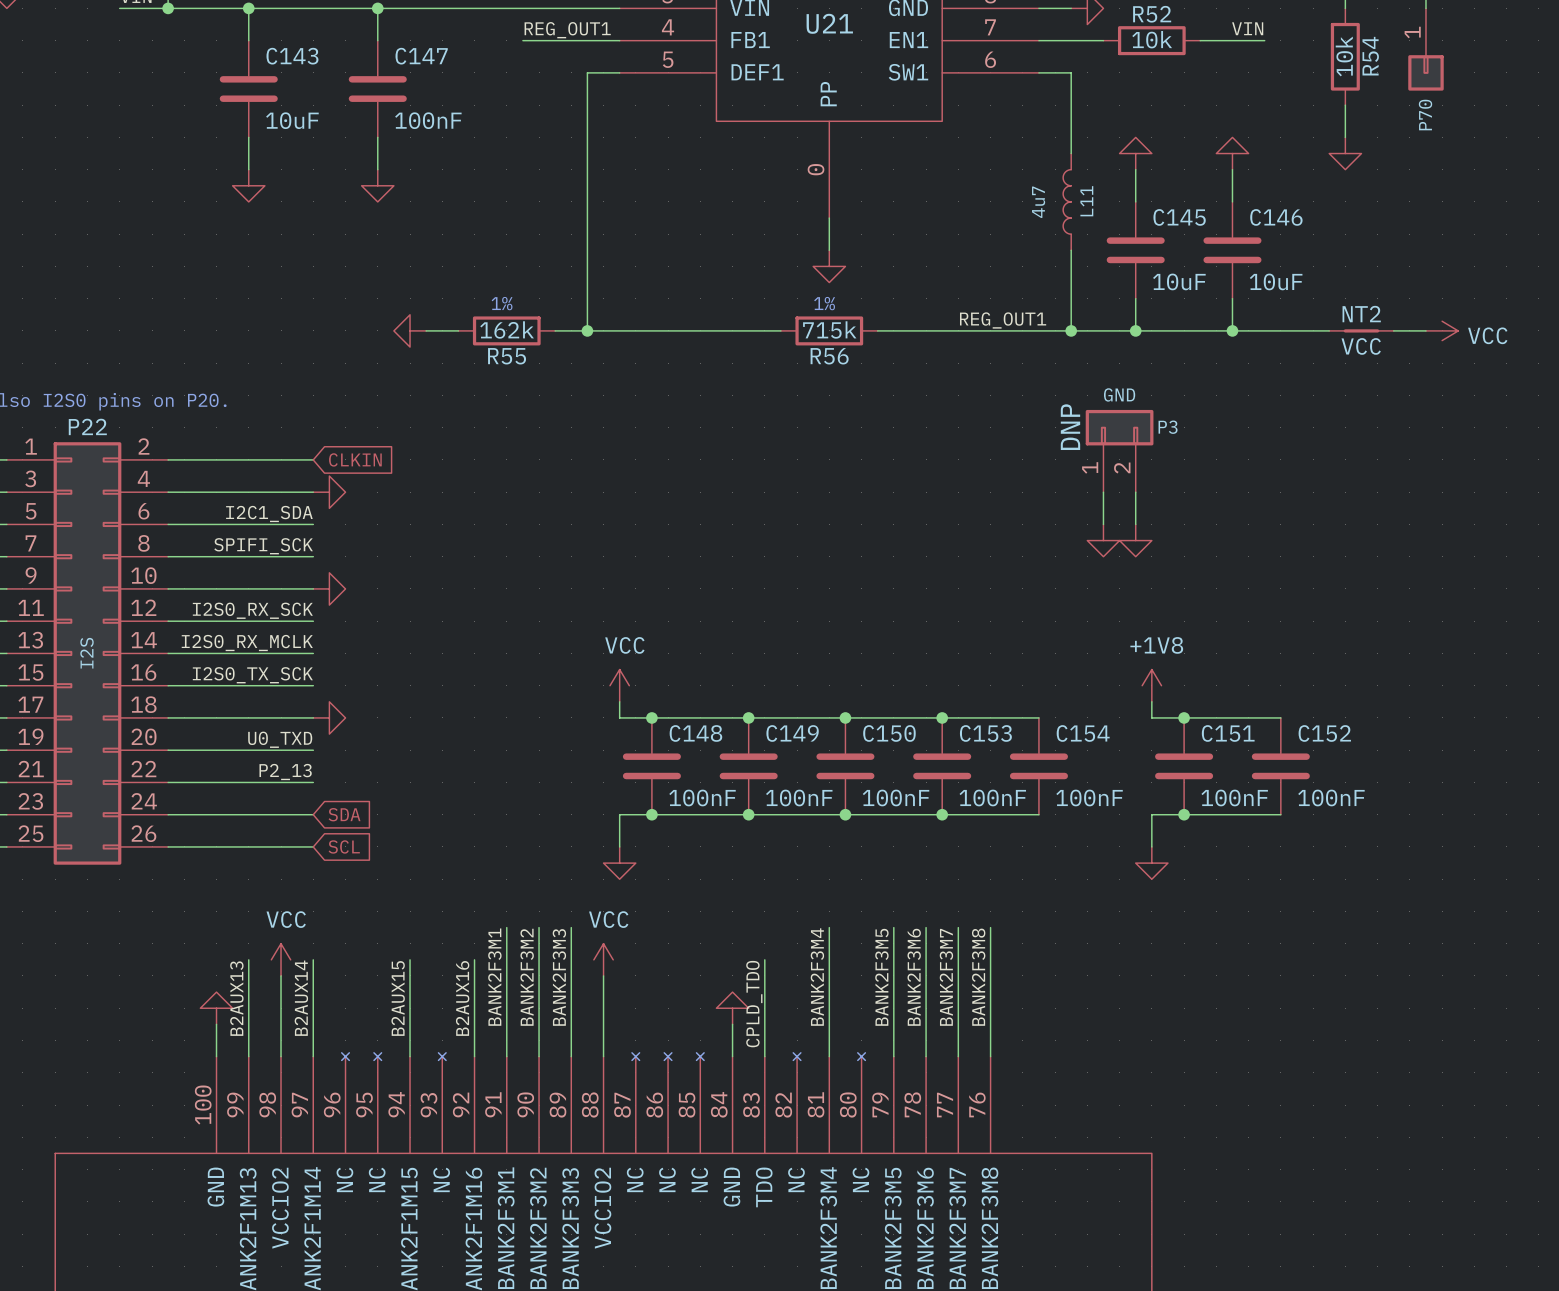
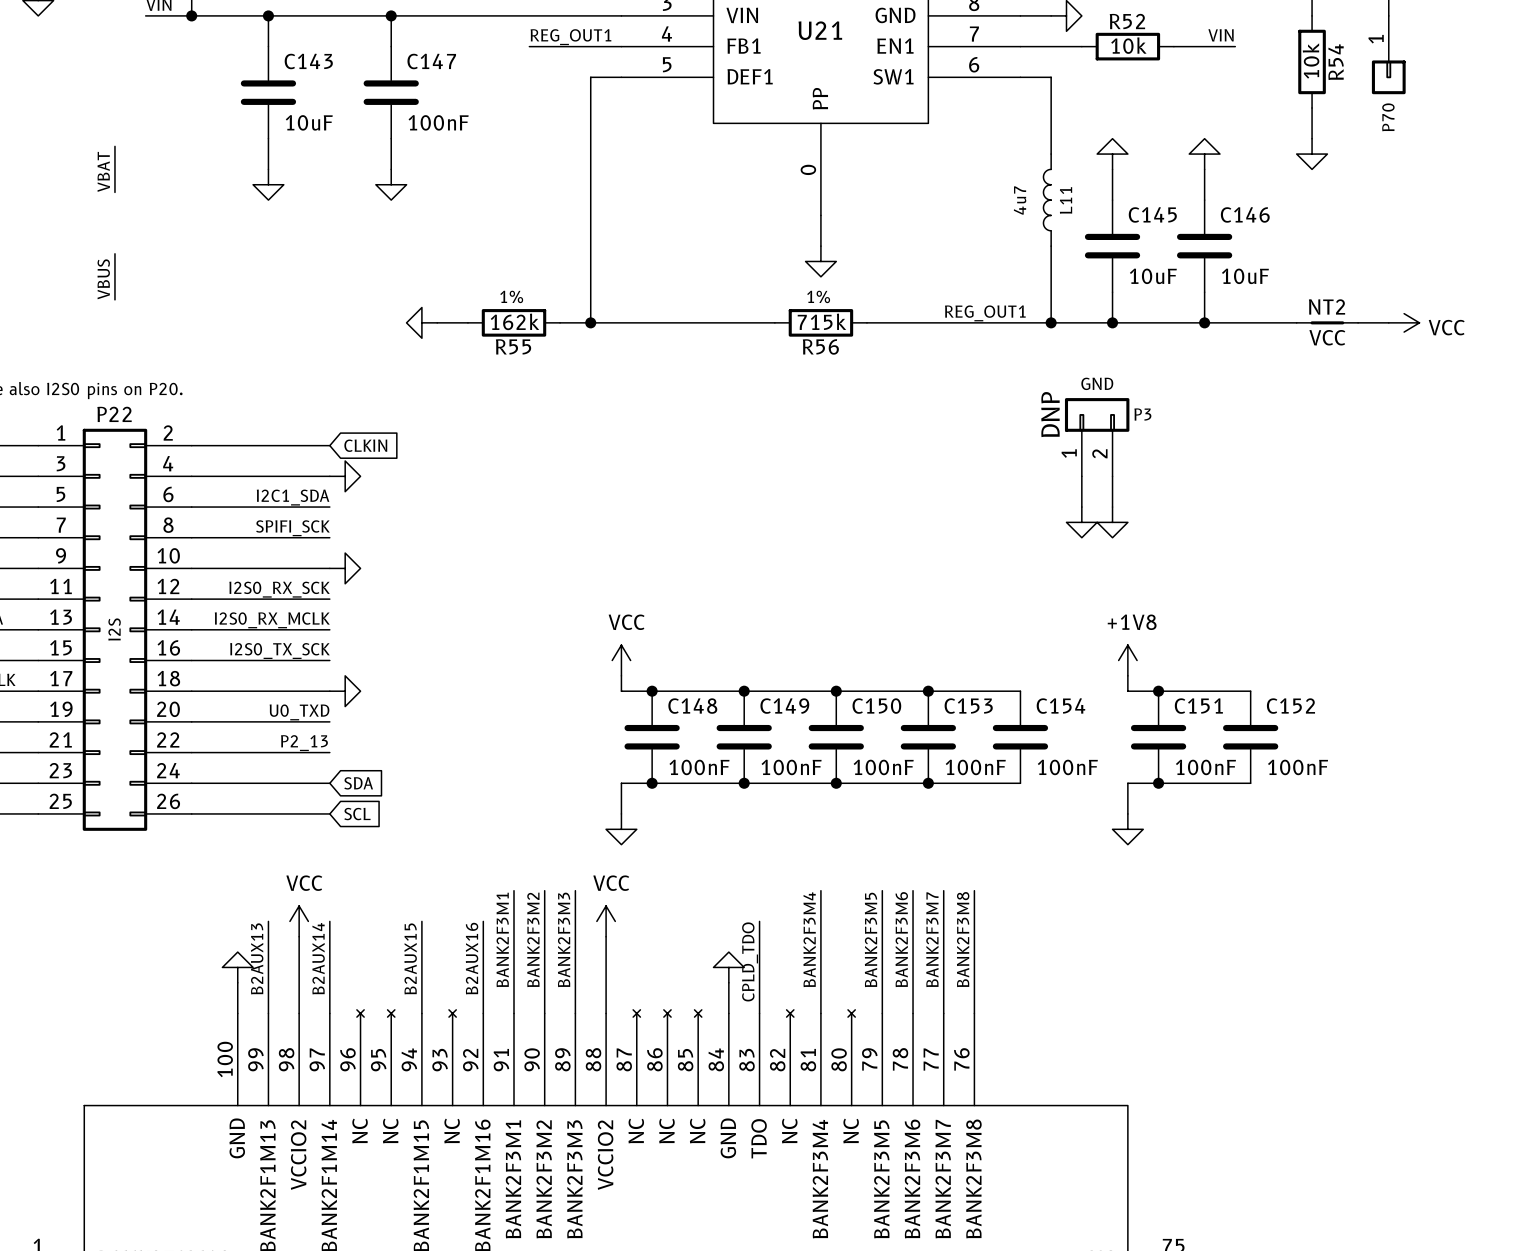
wire: none -> (114, 146) (114, 192)
label: none -> VBAT (103, 171)
wire: none -> (114, 253) (114, 299)
label: none -> VBUS (103, 279)

